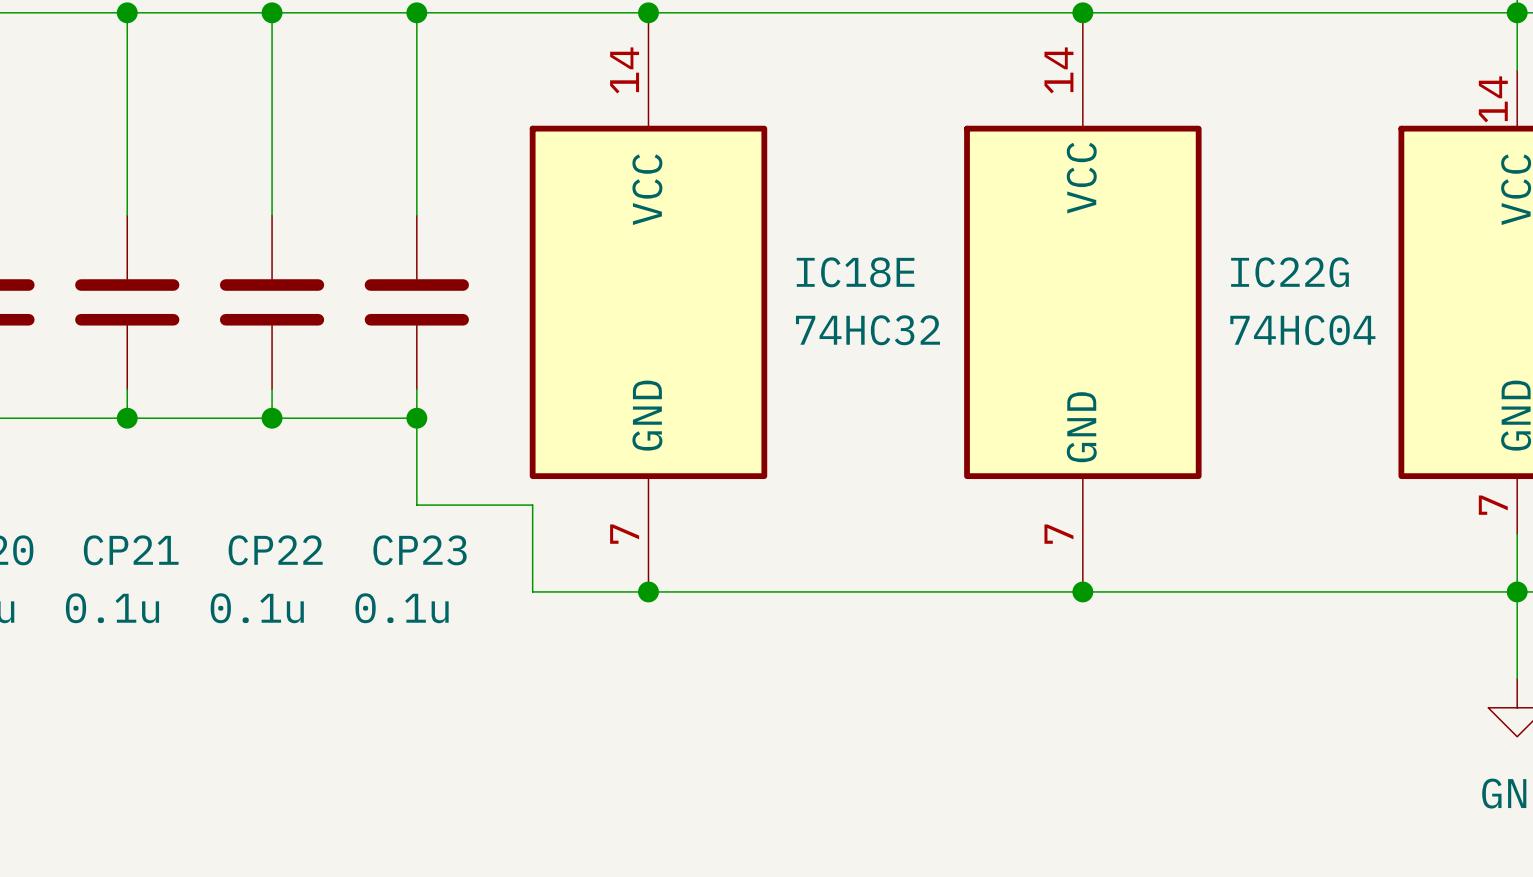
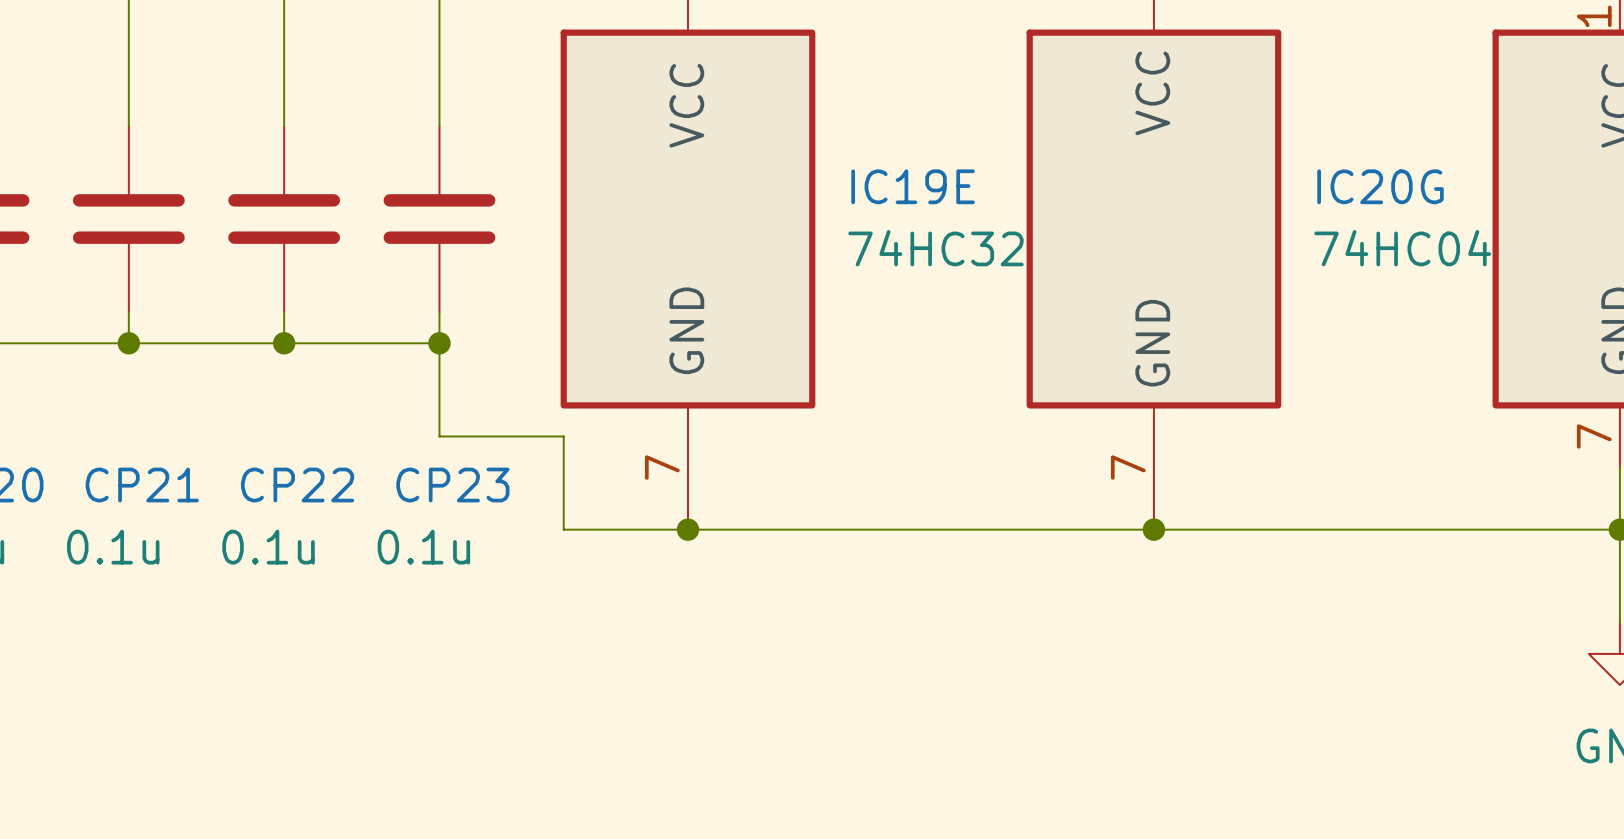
IC18E name: IC18E (855, 272) -> IC19E (913, 186)
IC22G name: IC22G (1289, 272) -> IC20G (1380, 186)

